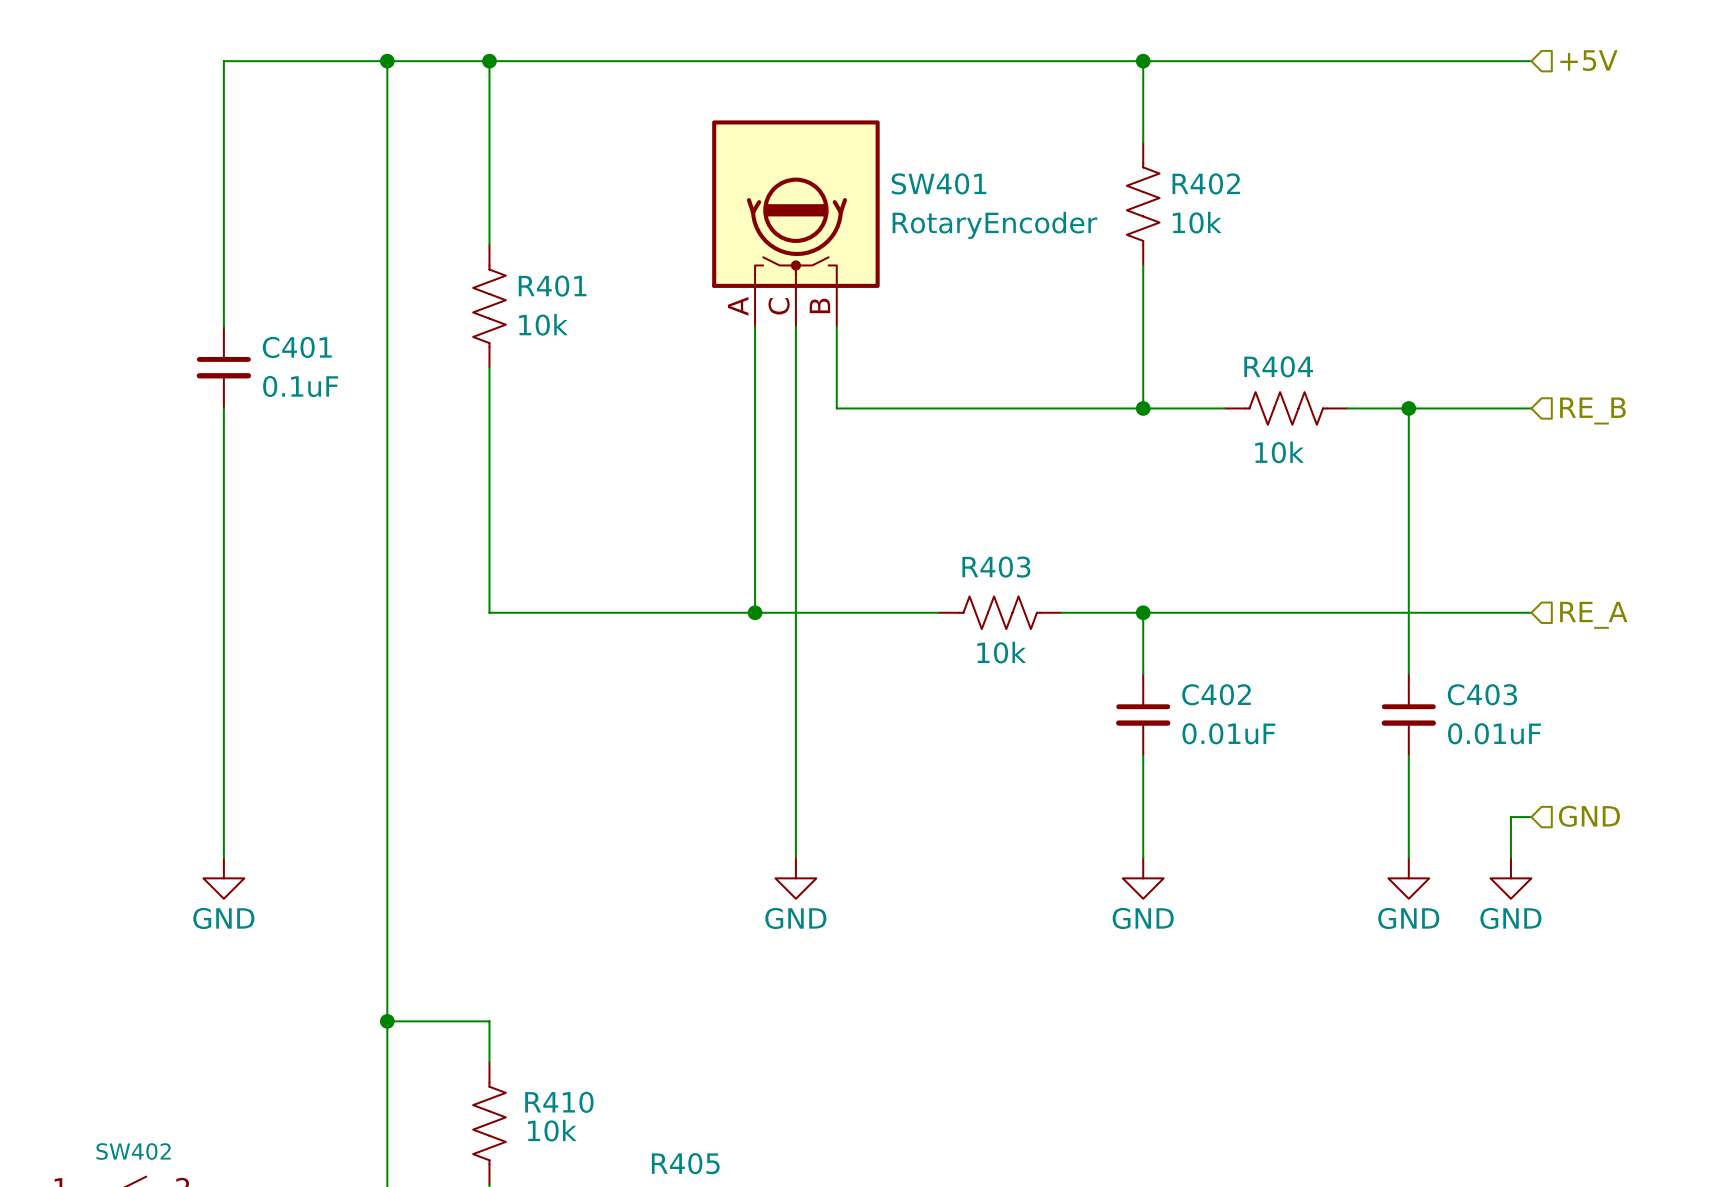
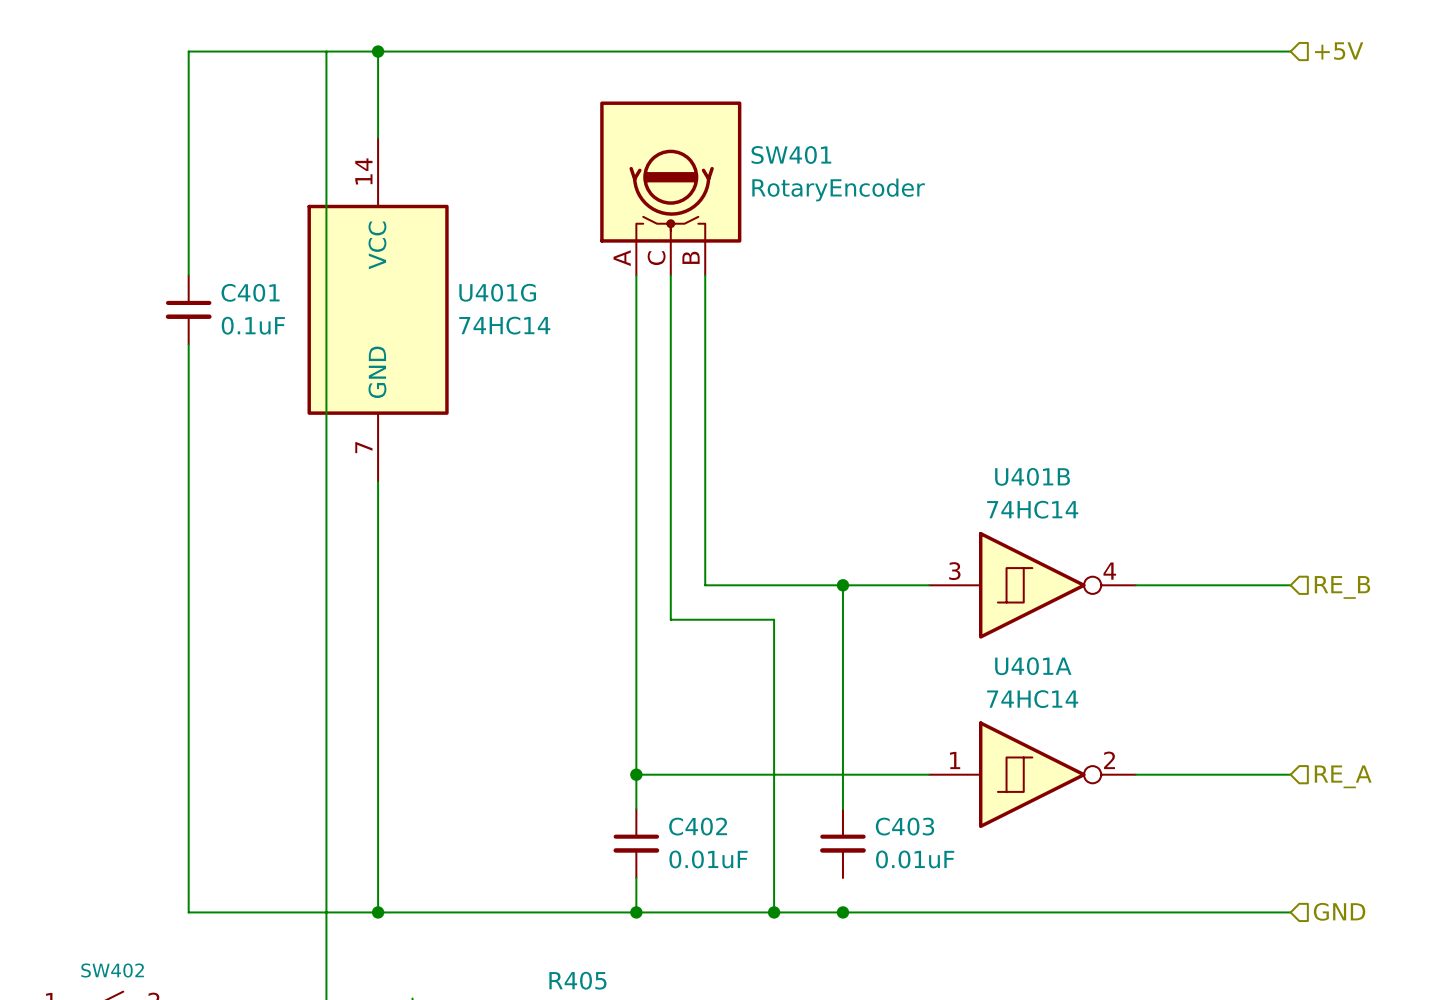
junction: (387, 61) -> none
wire: none -> (378, 51) (378, 137)
junction: none -> (378, 51)
wire: (489, 61) (489, 245) -> none
junction: (489, 61) -> none
wire: (1143, 61) (1143, 142) -> none
junction: (1143, 61) -> none
R402: 10k (1143, 204) -> none
wire: (1143, 265) (1143, 408) -> none
R401: 10k (489, 306) -> none
U401G: none -> 74HC14 (378, 309)
wire: (489, 367) (489, 612) (938, 612) -> none
wire: (836, 408) (1224, 408) -> (705, 344) (705, 585) (929, 585)
junction: (1143, 408) -> none
R404: 10k (1286, 408) -> none
wire: (1347, 408) (1531, 408) -> (1135, 585) (1290, 585)
wire: (1408, 408) (1408, 674) -> none
junction: (1408, 408) -> none
hierarchical label position: RE_B (1592, 411) -> RE_B (1342, 587)
wire: none -> (378, 481) (378, 912)
wire: none -> (636, 516) (636, 809)
junction: (755, 612) -> none
R403: 10k (1000, 612) -> none
wire: (1061, 612) (1531, 612) -> none
wire: (1143, 612) (1143, 674) -> none
junction: (1143, 612) -> none
hierarchical label position: RE_A (1593, 615) -> RE_A (1343, 776)
wire: none -> (842, 585) (842, 809)
junction: none -> (842, 585)
U401B: none -> 74HC14 (1032, 585)
C402 position: (1143, 714) -> (636, 843)
C403 position: (1408, 714) -> (842, 843)
wire: (795, 735) (795, 857) -> (670, 619) (774, 619) (774, 912)
wire: (1143, 755) (1143, 857) -> none
wire: (1408, 755) (1408, 857) -> none
hierarchical label position: GND (1589, 816) -> GND (1339, 911)
wire: (1531, 817) (1510, 817) (1510, 857) -> none
wire: none -> (188, 723) (188, 912) (1290, 912)
power symbol: GND (223, 878) -> none
power symbol: GND (795, 878) -> none
power symbol: GND (1143, 878) -> none
power symbol: GND (1408, 878) -> none
power symbol: GND (1510, 878) -> none
wire: none -> (636, 774) (929, 774)
junction: none -> (636, 774)
U401A: none -> 74HC14 (1032, 774)
wire: none -> (1135, 774) (1290, 774)
wire: (387, 1021) (489, 1021) (489, 1062) -> none
junction: (387, 1021) -> none
wire: none -> (636, 878) (636, 912)
junction: none -> (378, 912)
junction: none -> (636, 912)
junction: none -> (774, 912)
junction: none -> (842, 912)
R410: 10k (489, 1123) -> none

